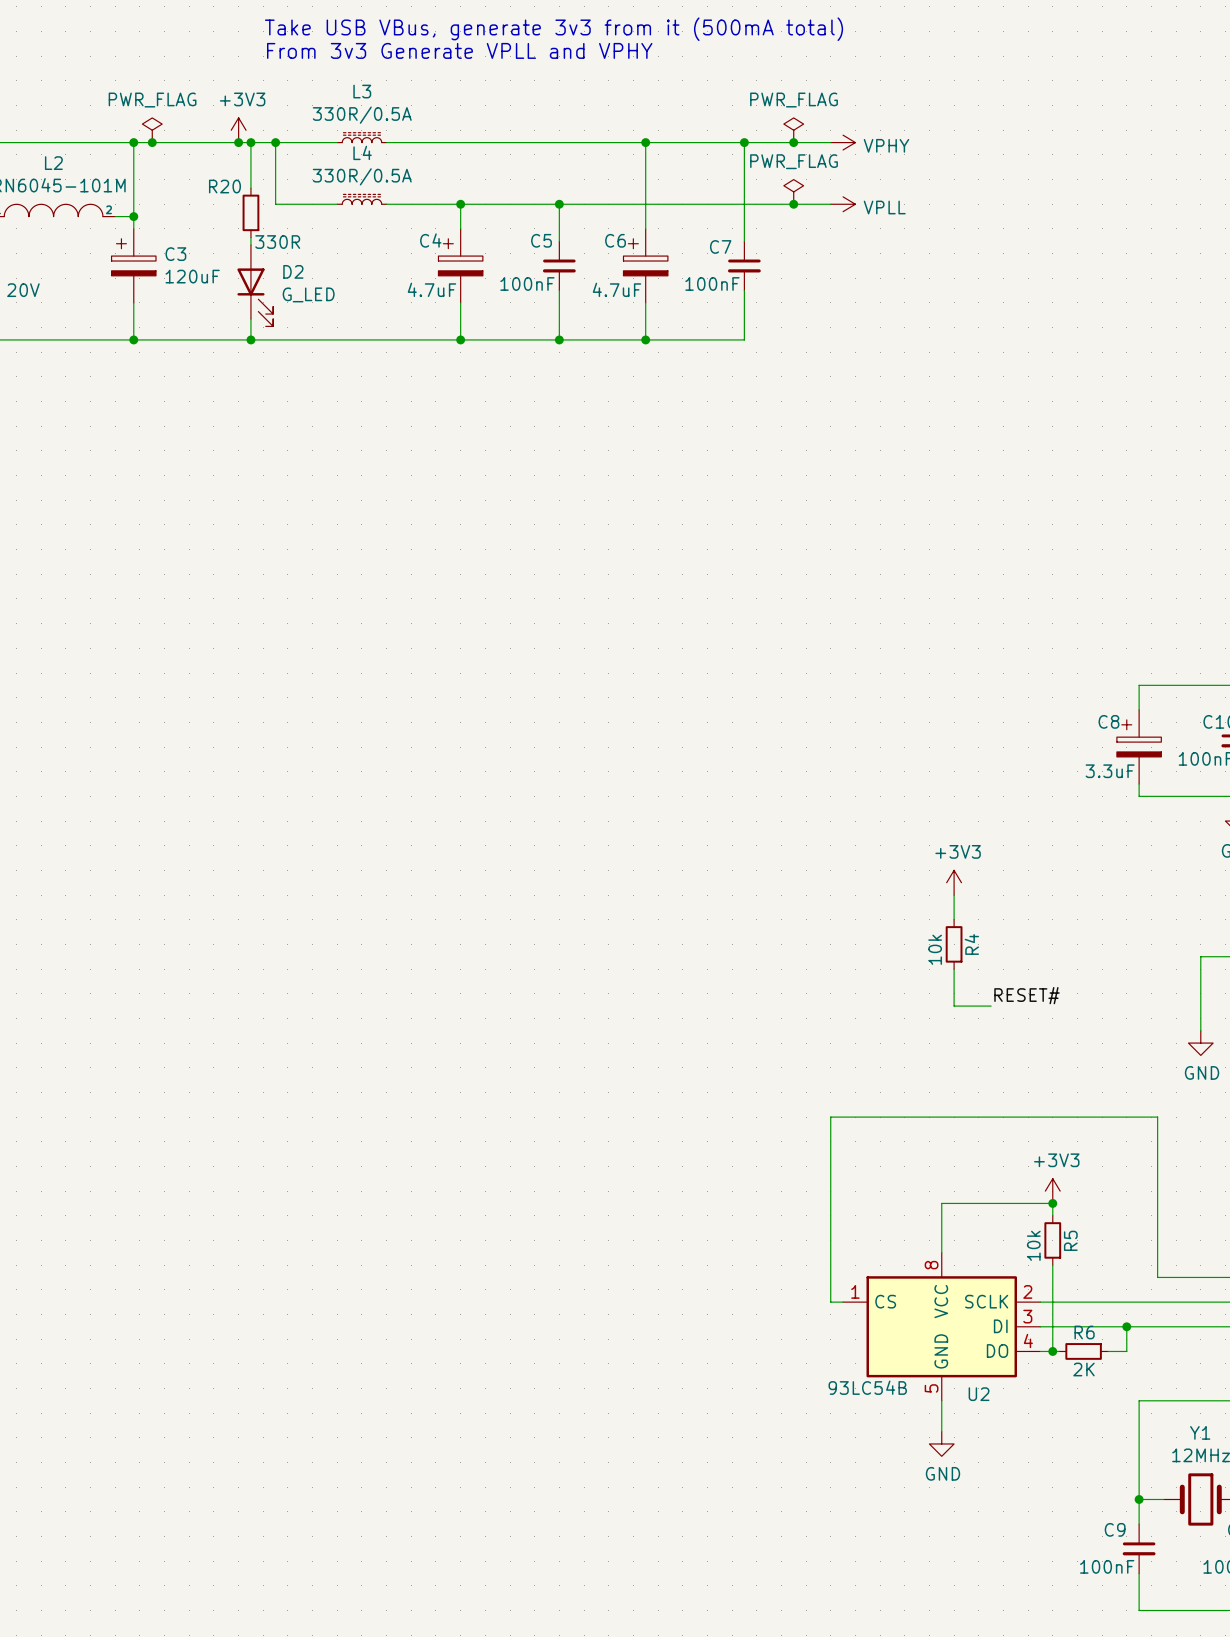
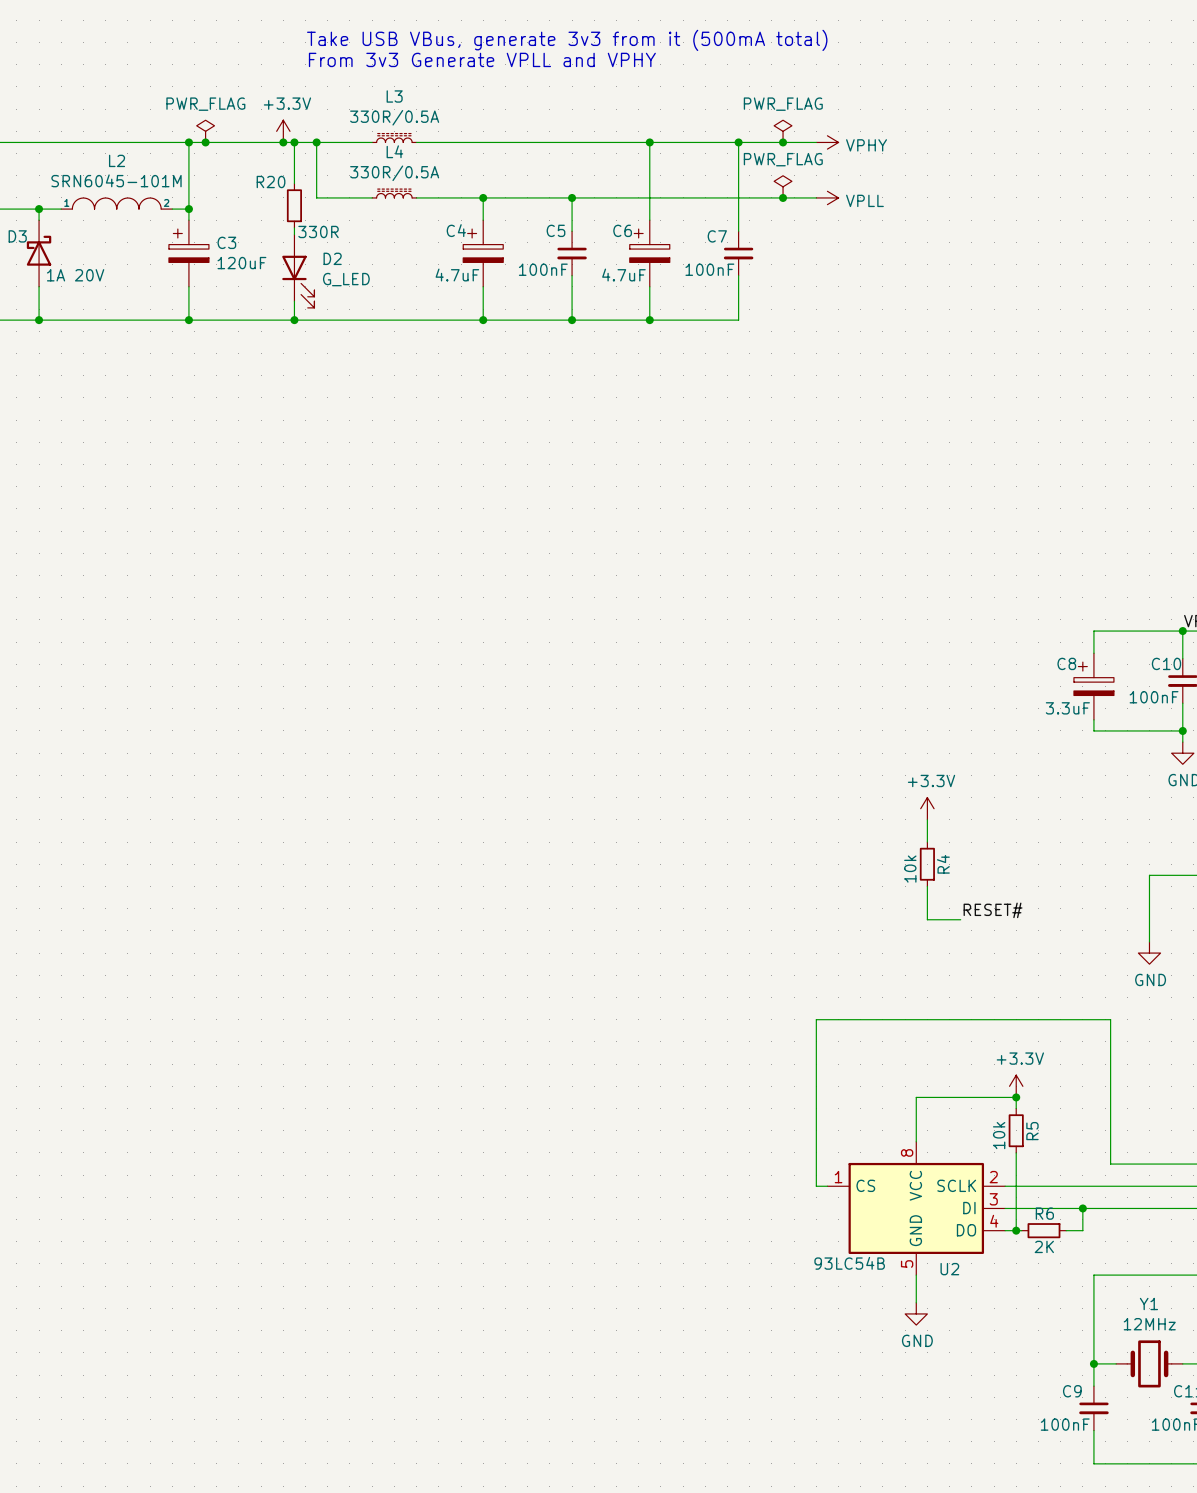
power symbol: +3V3 (238, 130) -> +3.3V (283, 131)
power symbol: +3V3 (954, 882) -> +3.3V (927, 808)
power symbol: +3V3 (1052, 1191) -> +3.3V (1016, 1086)

